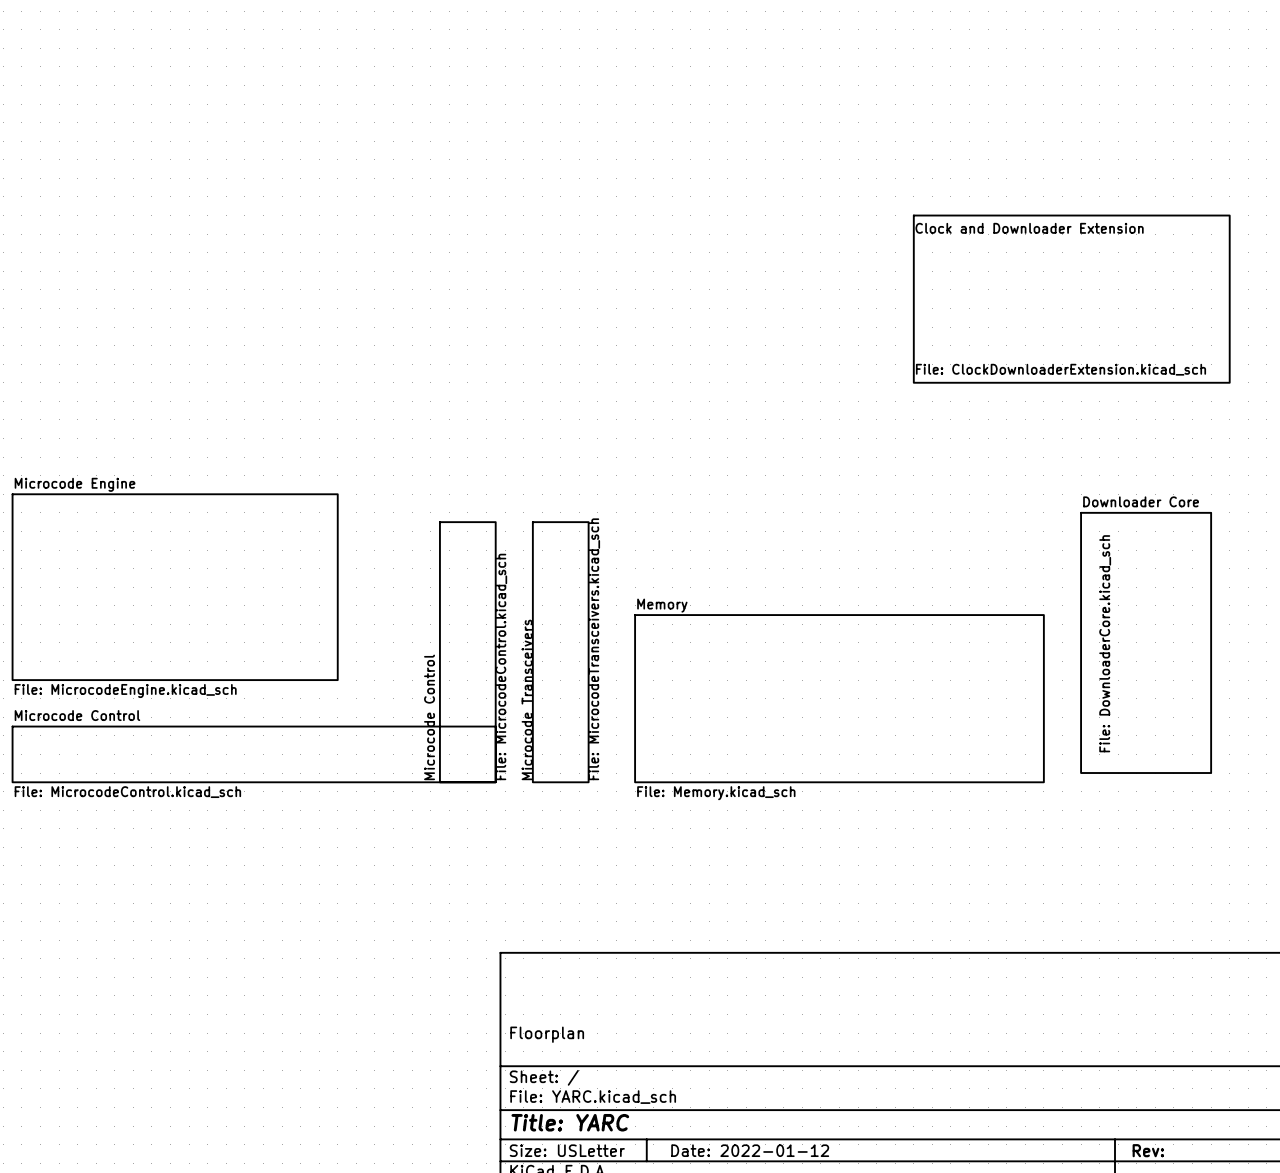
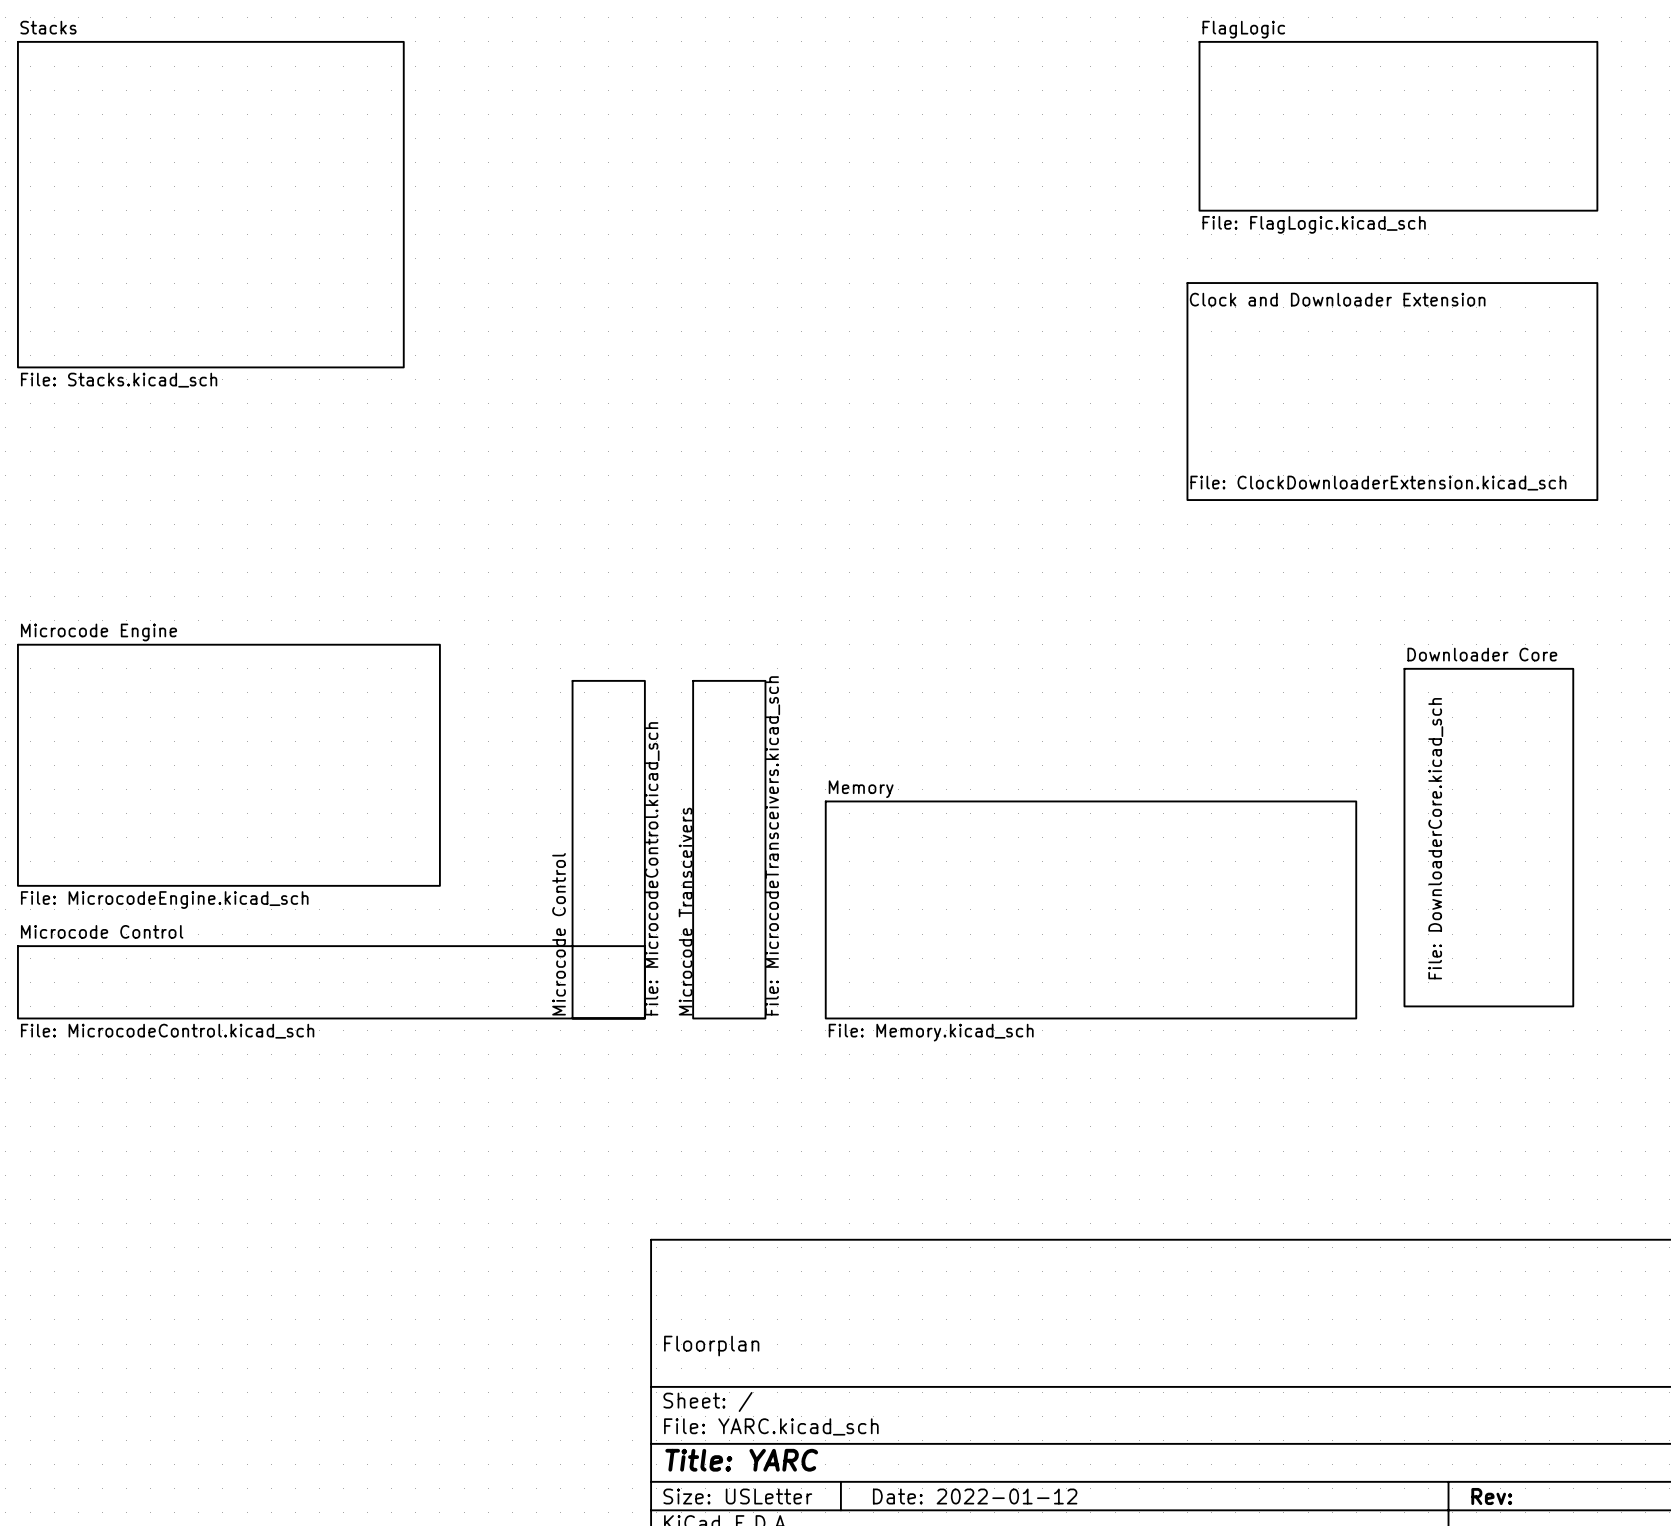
sheet FlagLogic: none -> File: FlagLogic.kicad_sch (1398, 126)
sheet Stacks: none -> File: Stacks.kicad_sch (210, 204)

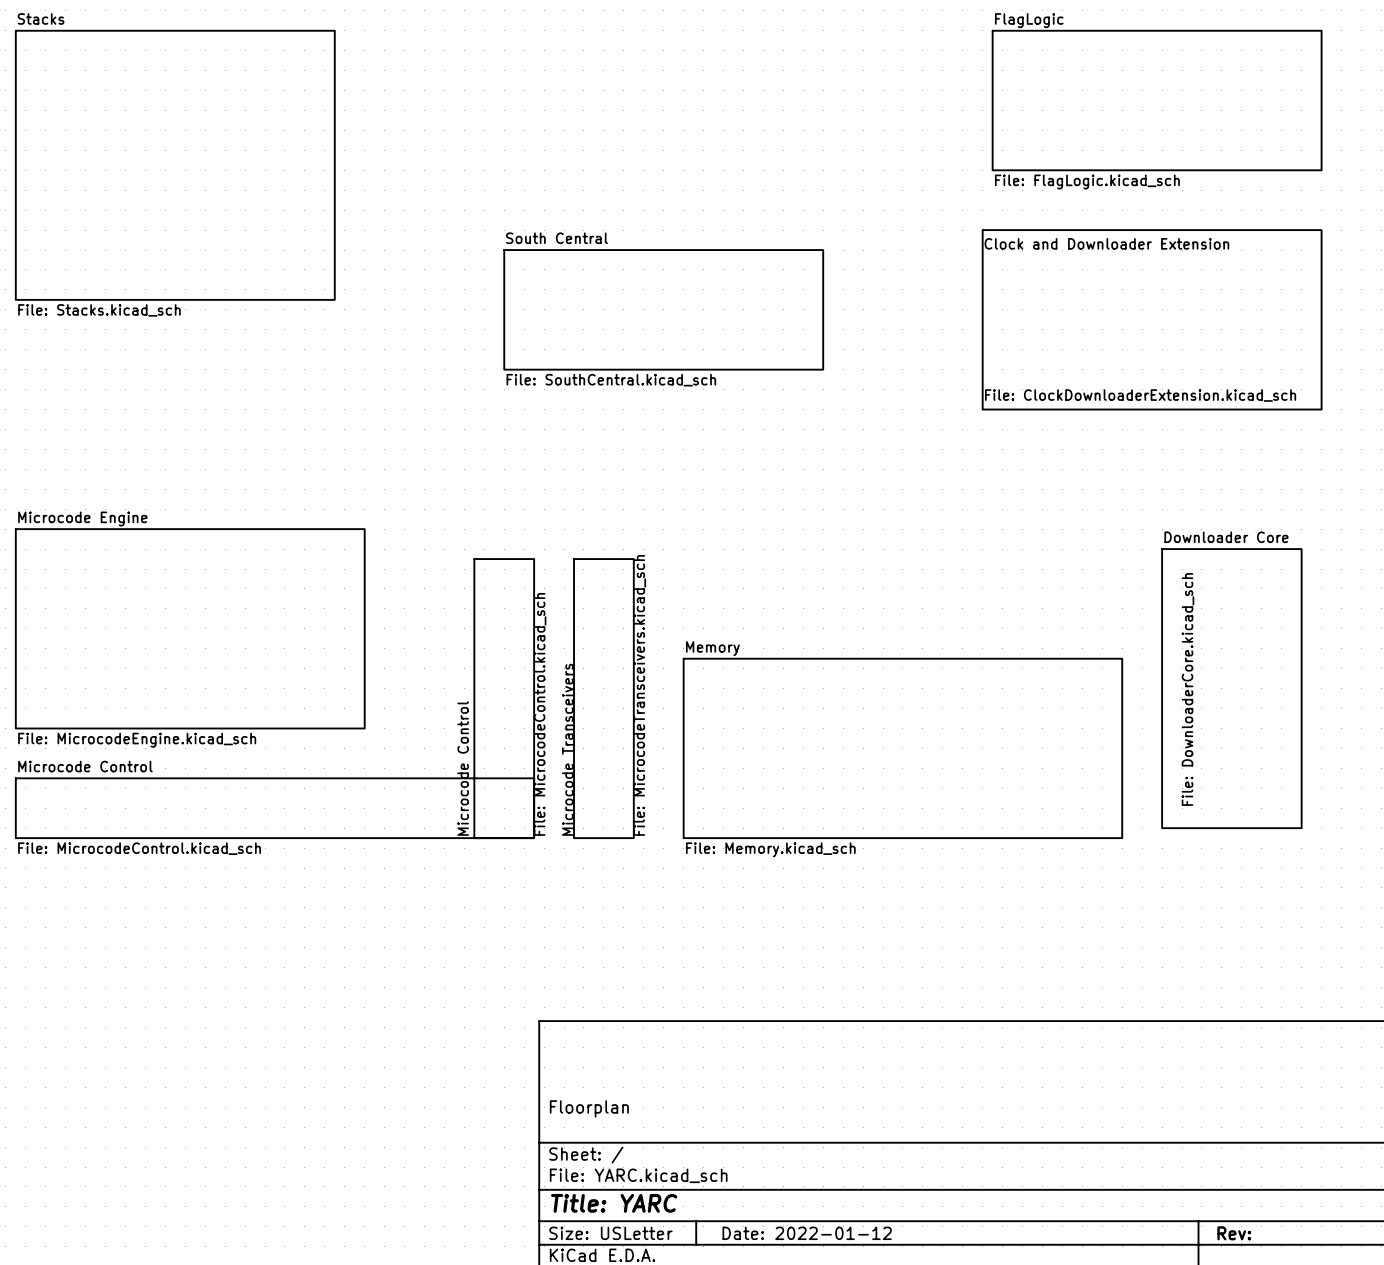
sheet South Central: none -> File: SouthCentral.kicad_sch (663, 309)

